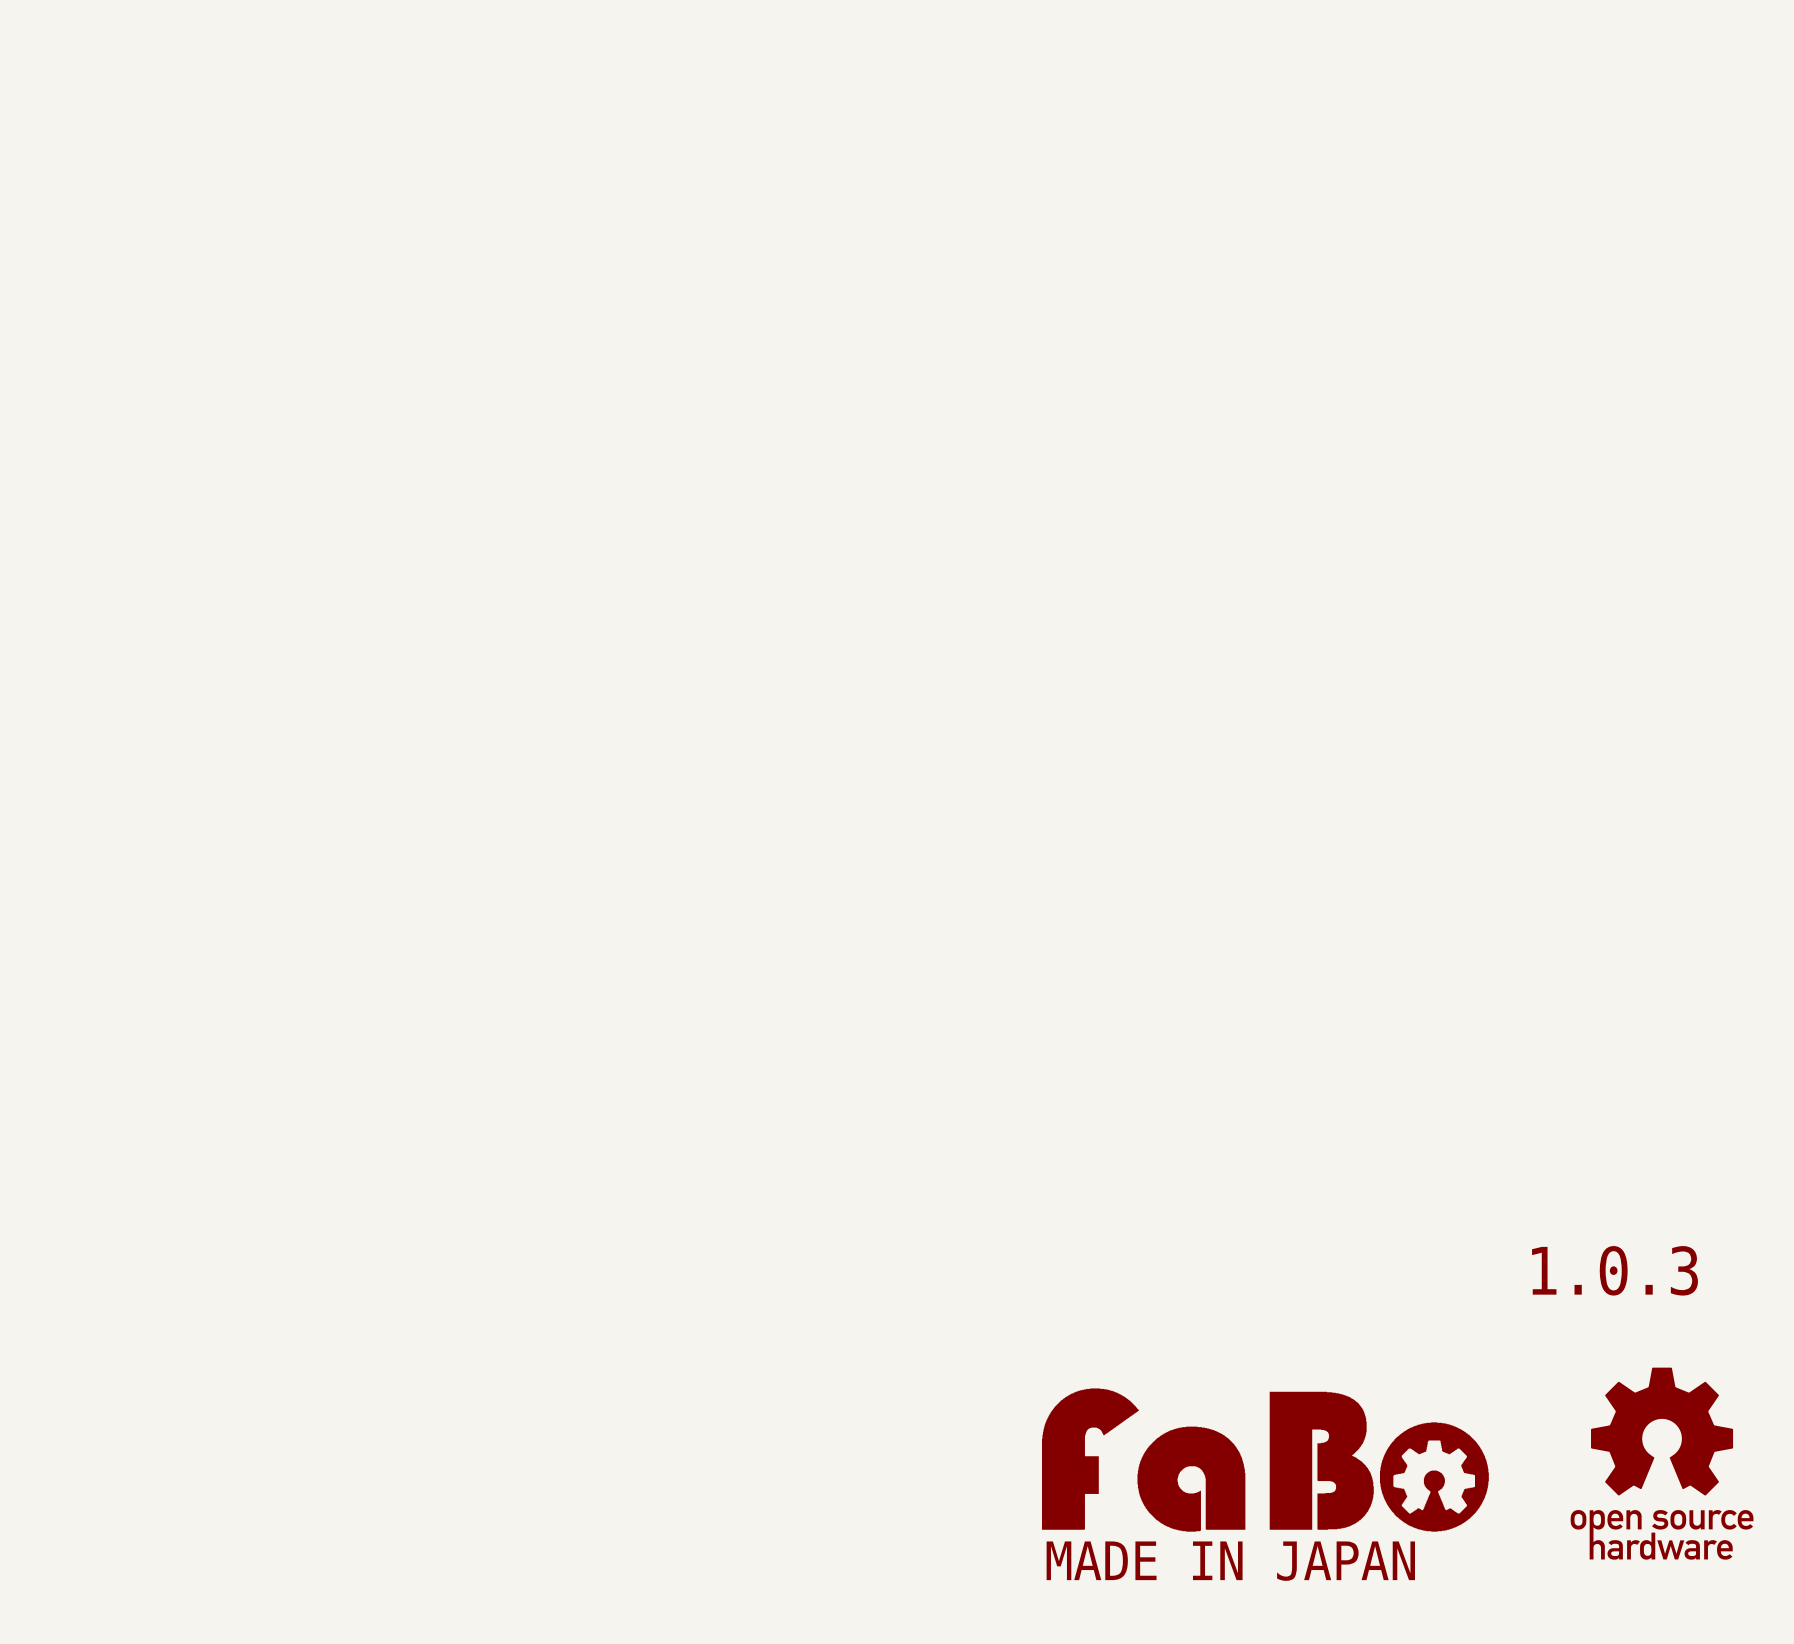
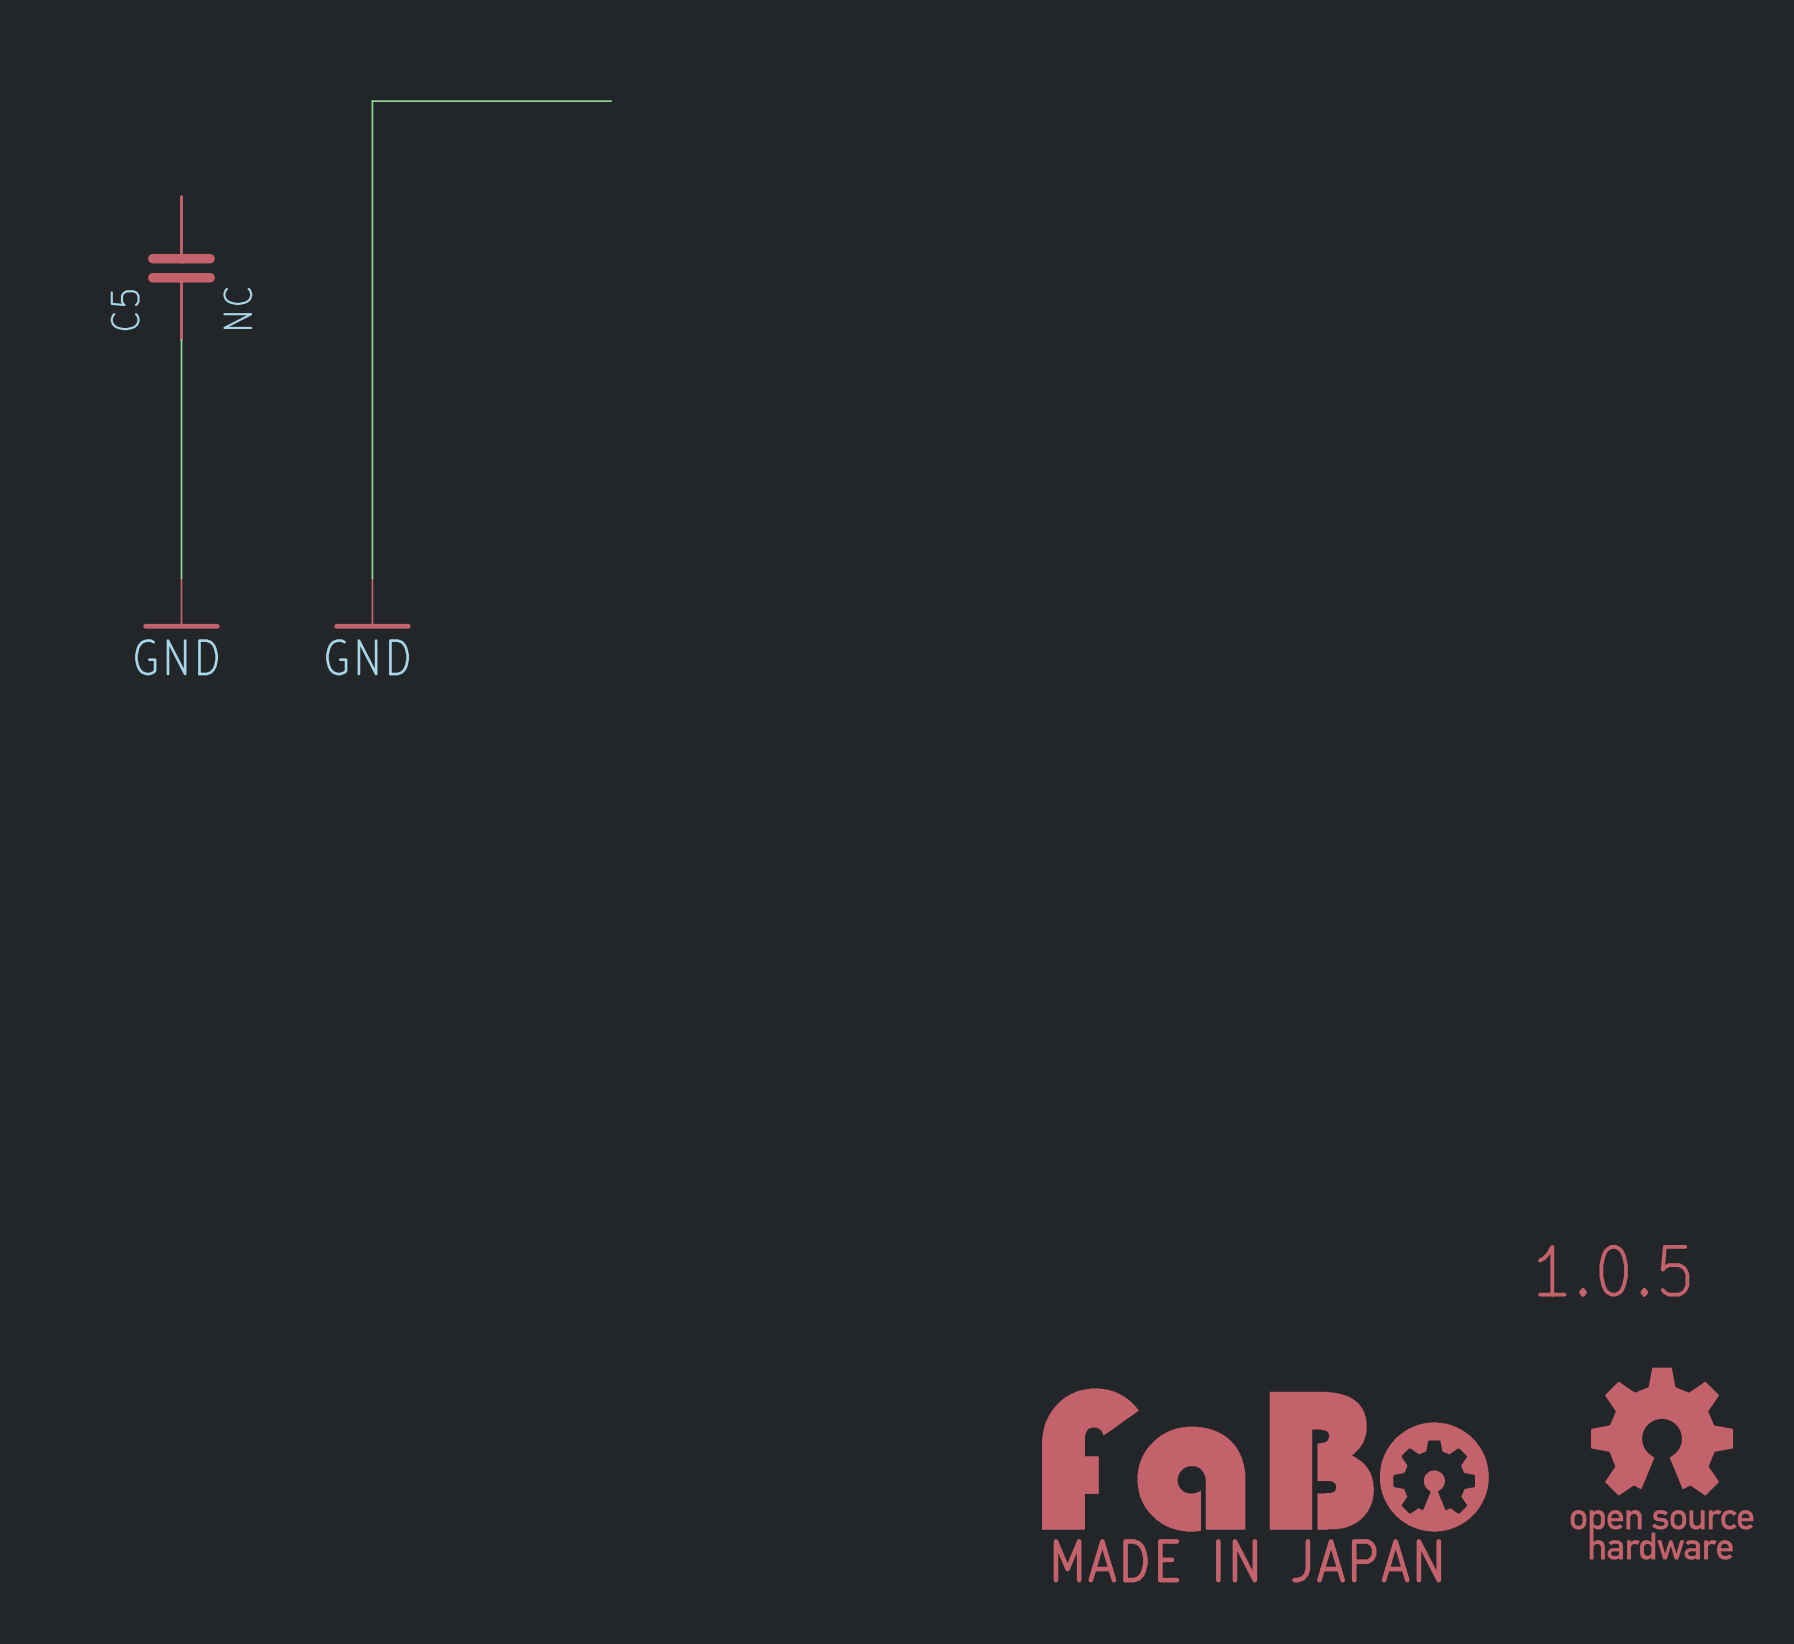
wire: none -> (611, 101) (372, 101) (372, 578)
C5: none -> NC (181, 268)
wire: none -> (181, 339) (181, 578)
power symbol: none -> GND (181, 603)
power symbol: none -> GND (372, 603)
text: 1.0.3 (1615, 1270) -> 1.0.5 (1613, 1270)

